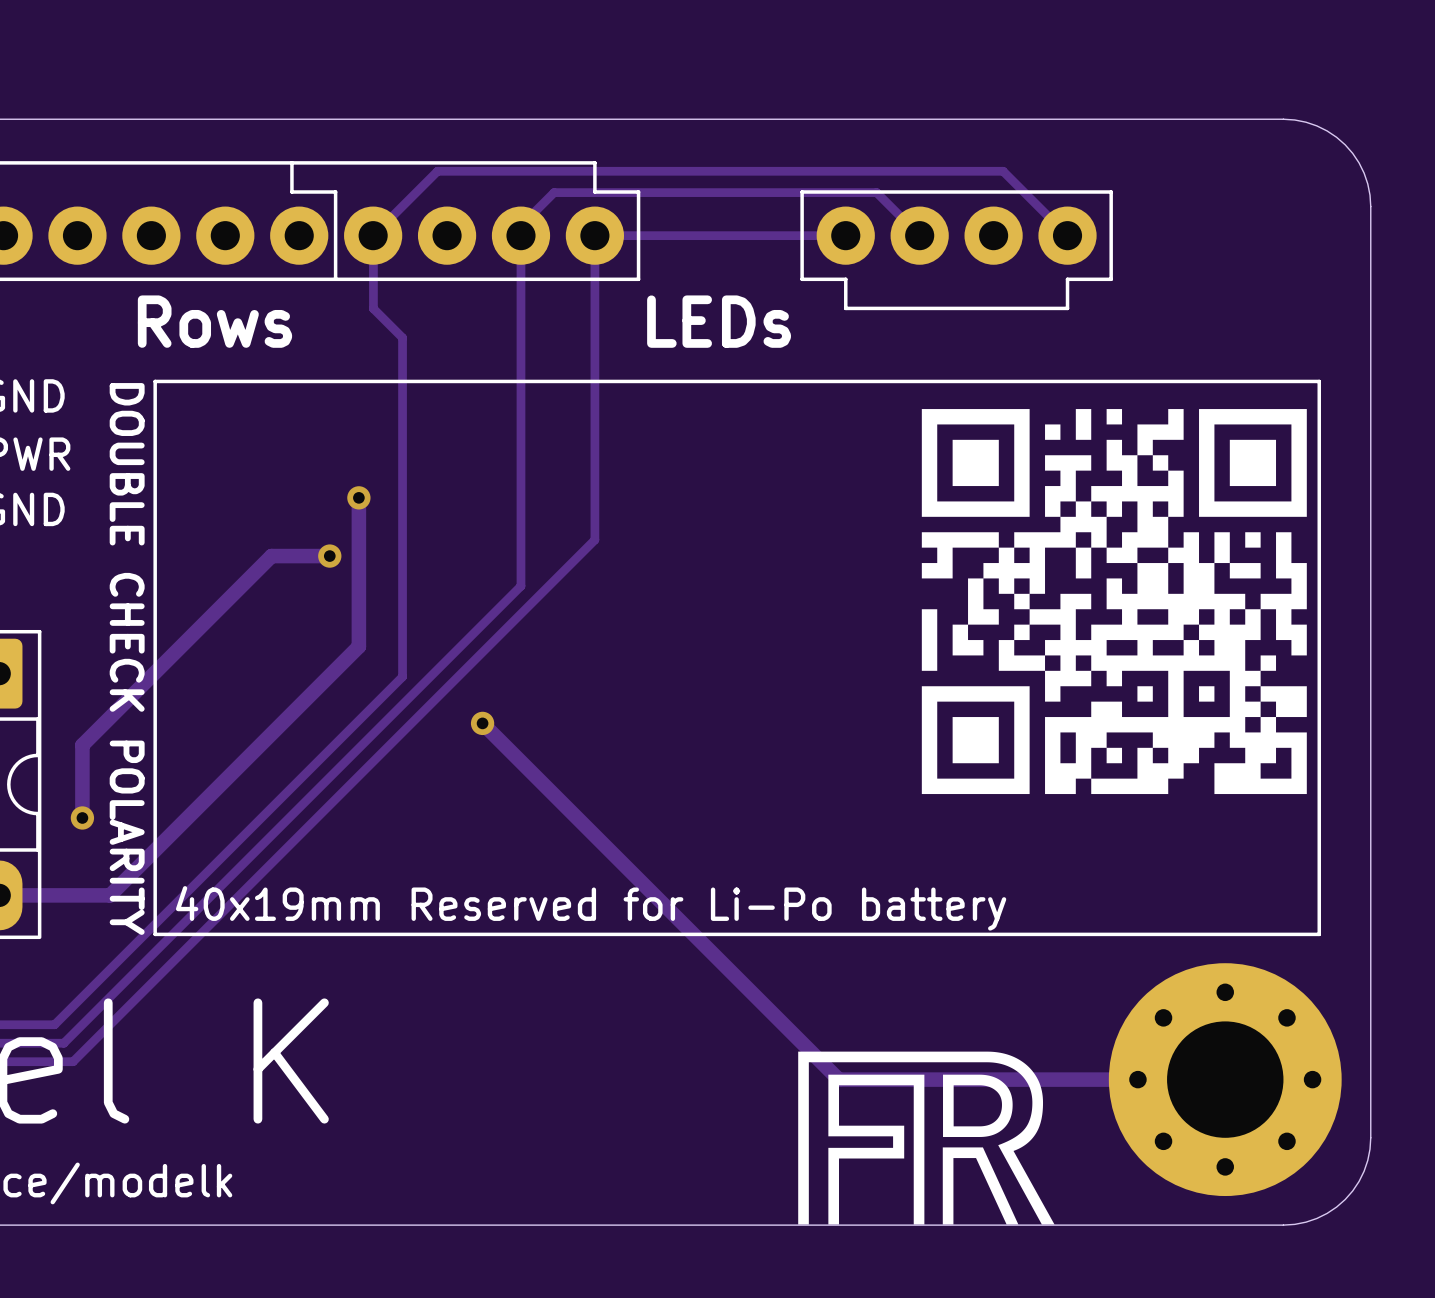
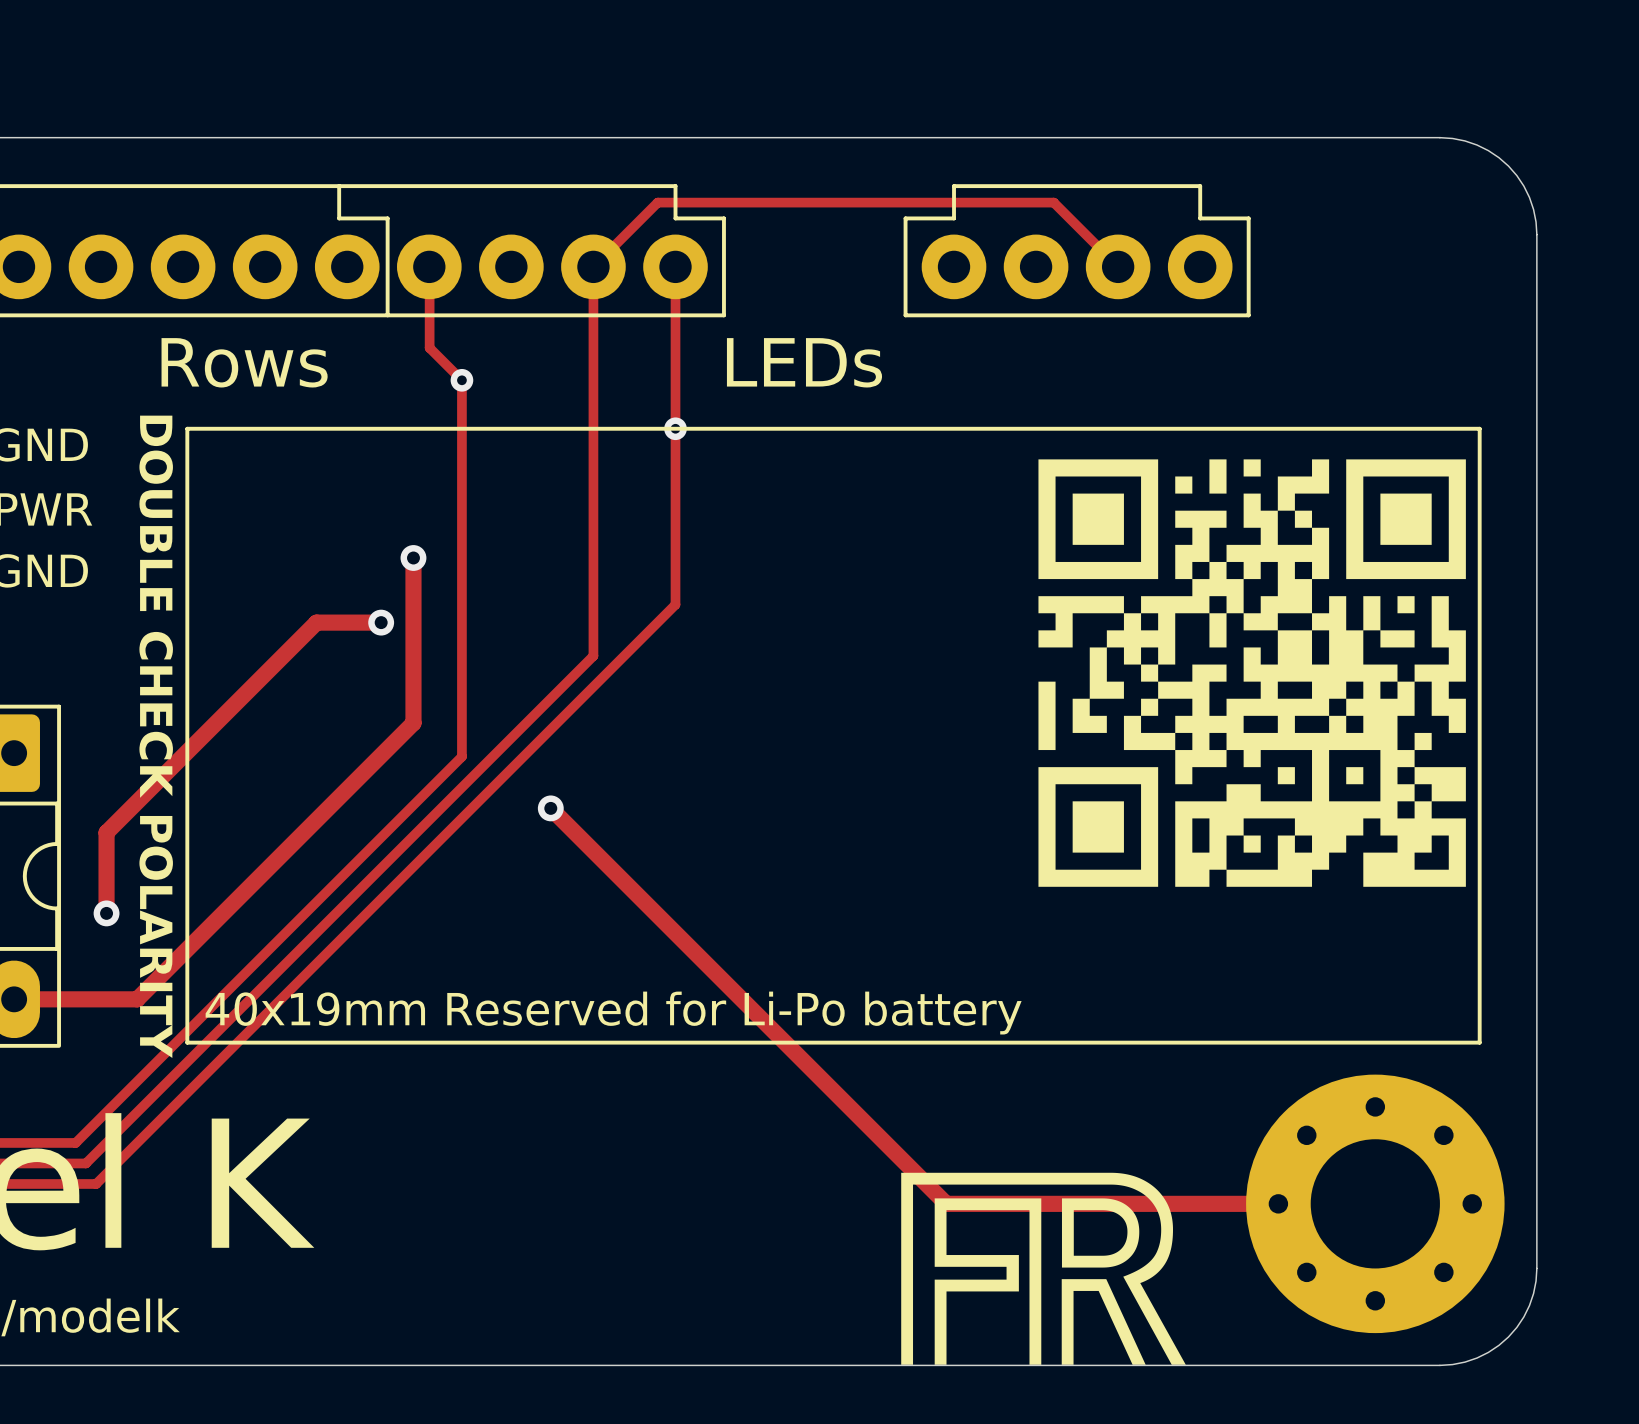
track: (373, 235) (437, 171) (1003, 171) (1067, 235) -> none
track: (520, 235) (520, 225) (554, 192) (876, 192) (919, 235) -> (593, 266) (657, 202) (1053, 202) (1118, 266)
track: (594, 235) (845, 235) -> none
part rotation: 0° (956, 250) -> 180° (1077, 250)
via: none -> (461, 380)
via: none -> (675, 428)

